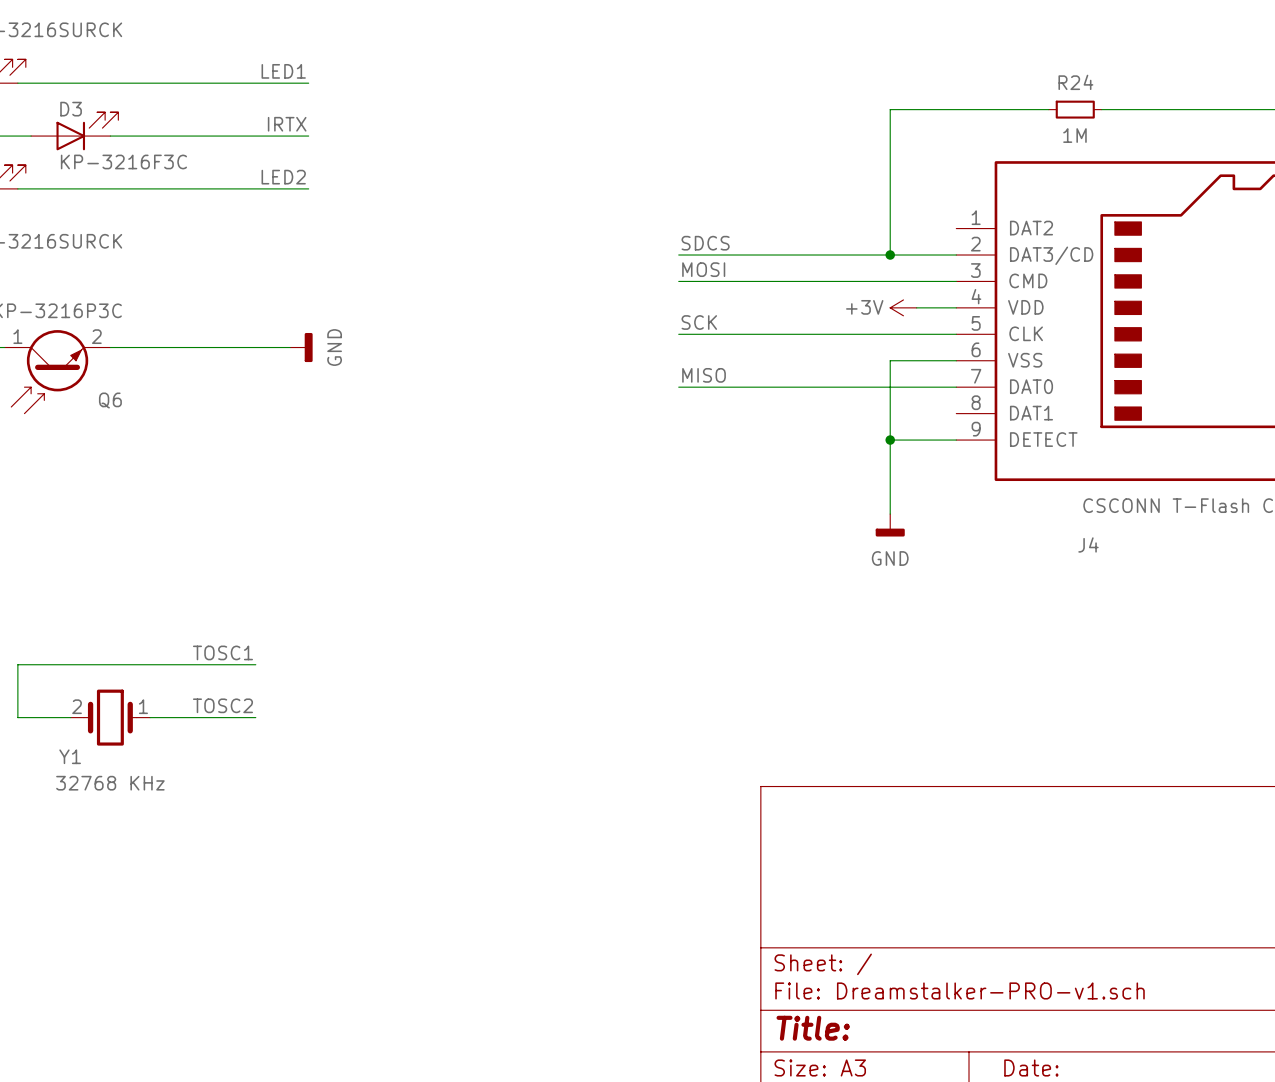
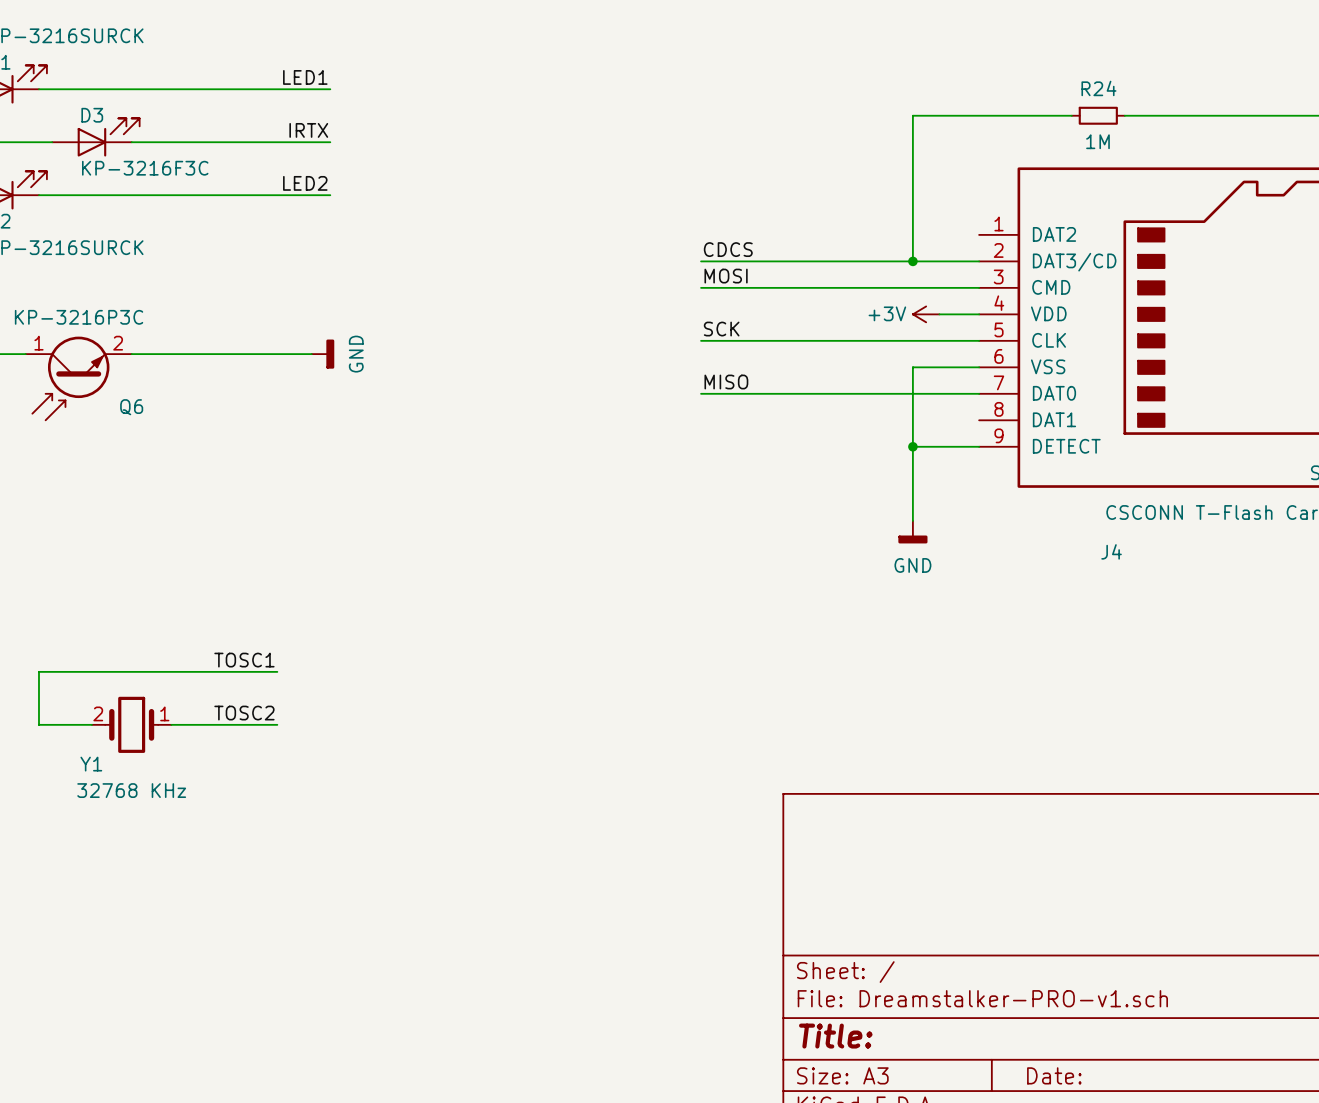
label: SDCS (705, 243) -> CDCS (728, 249)

